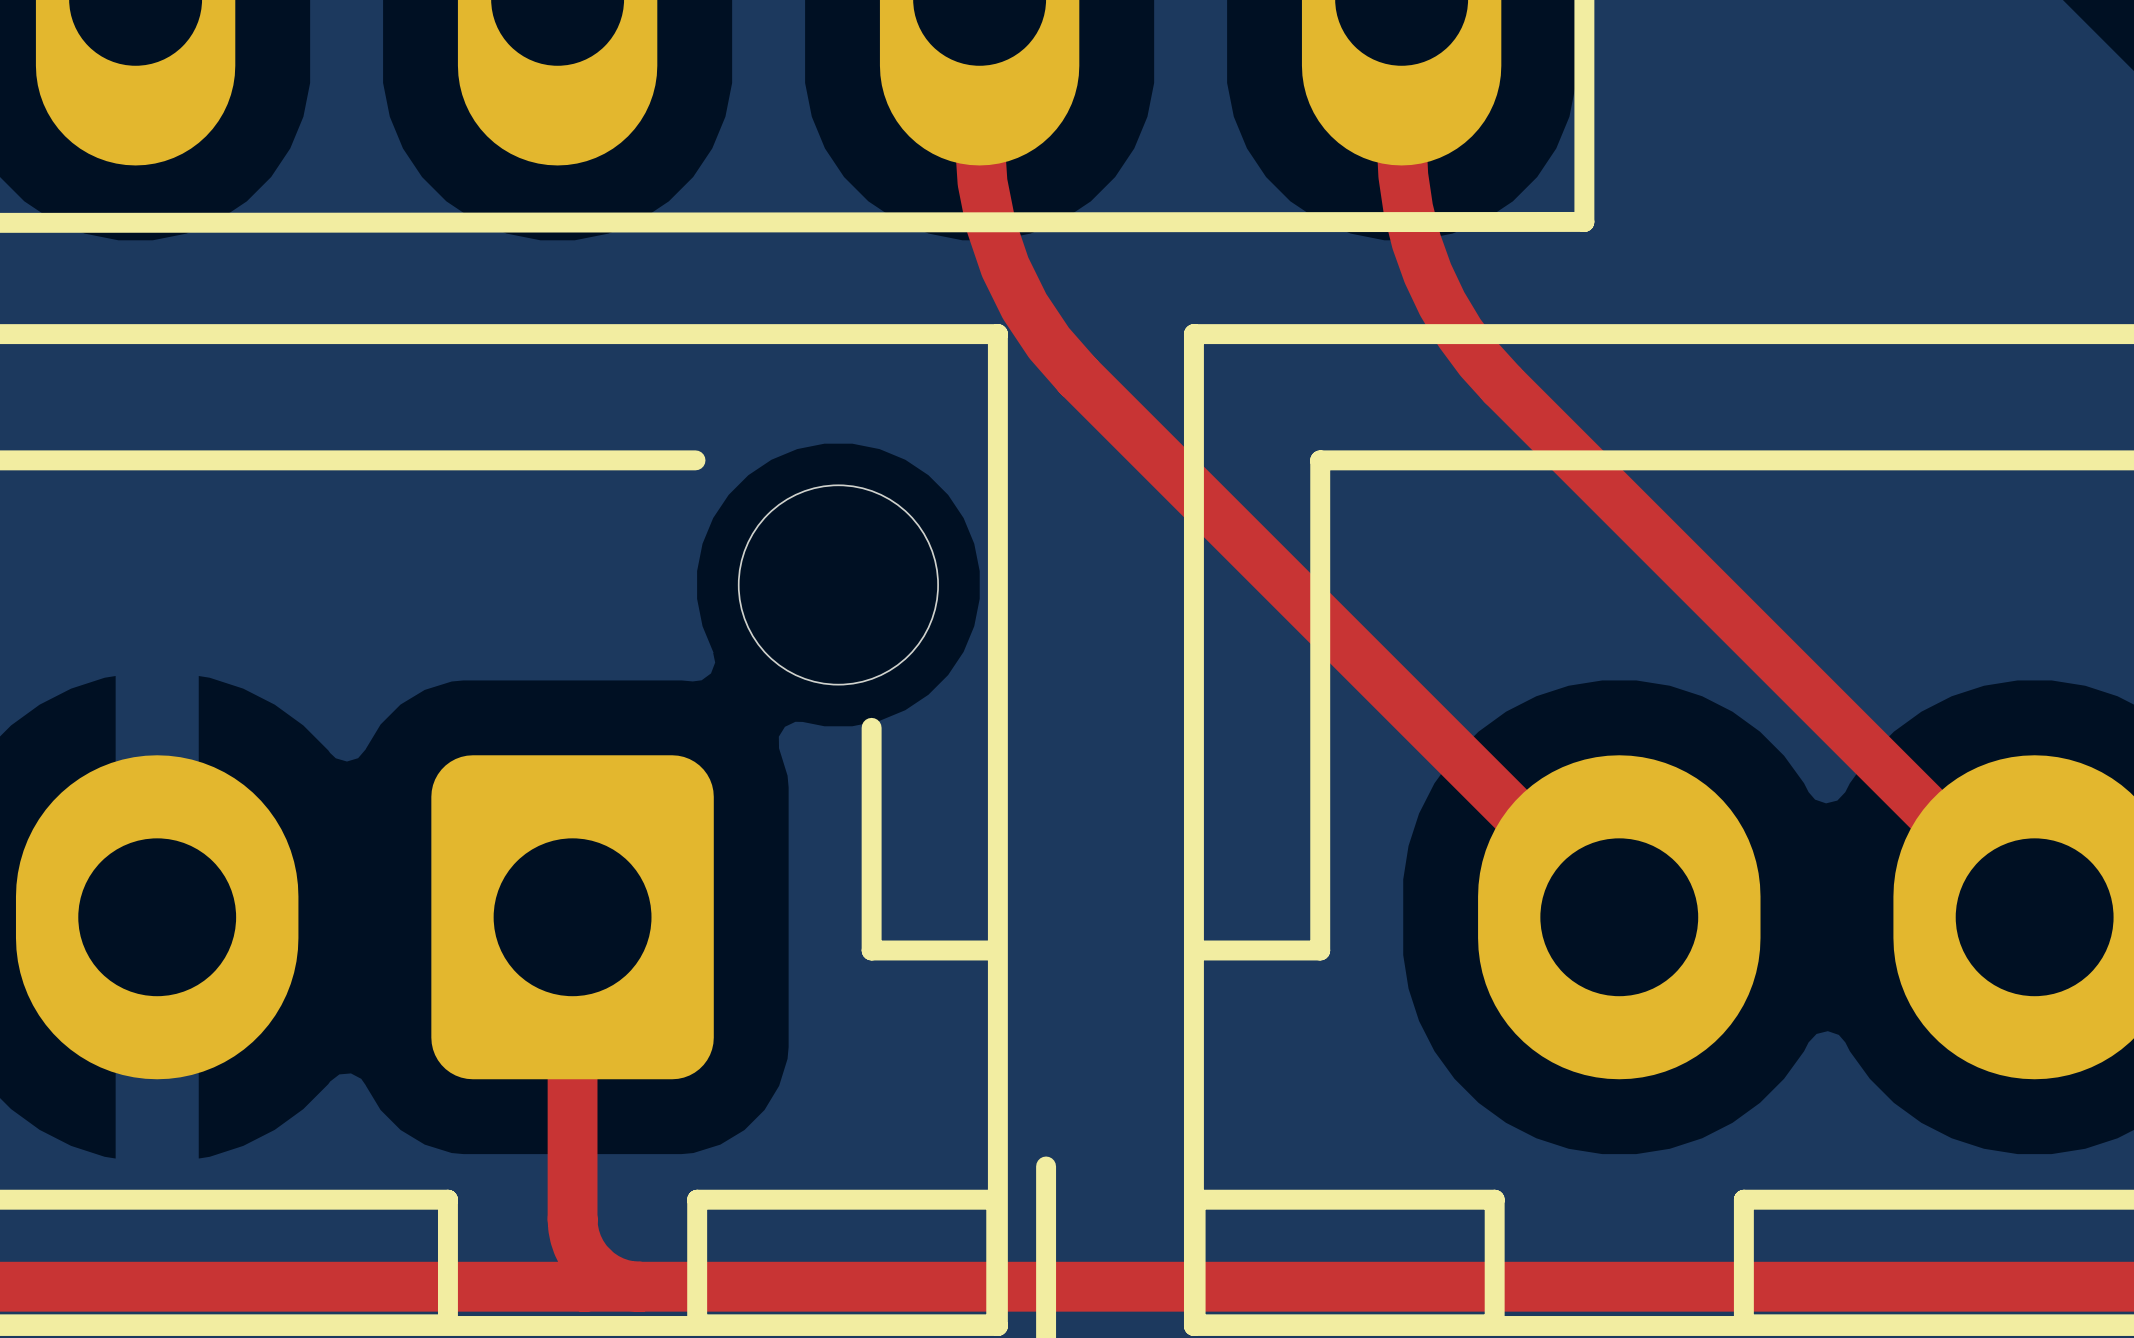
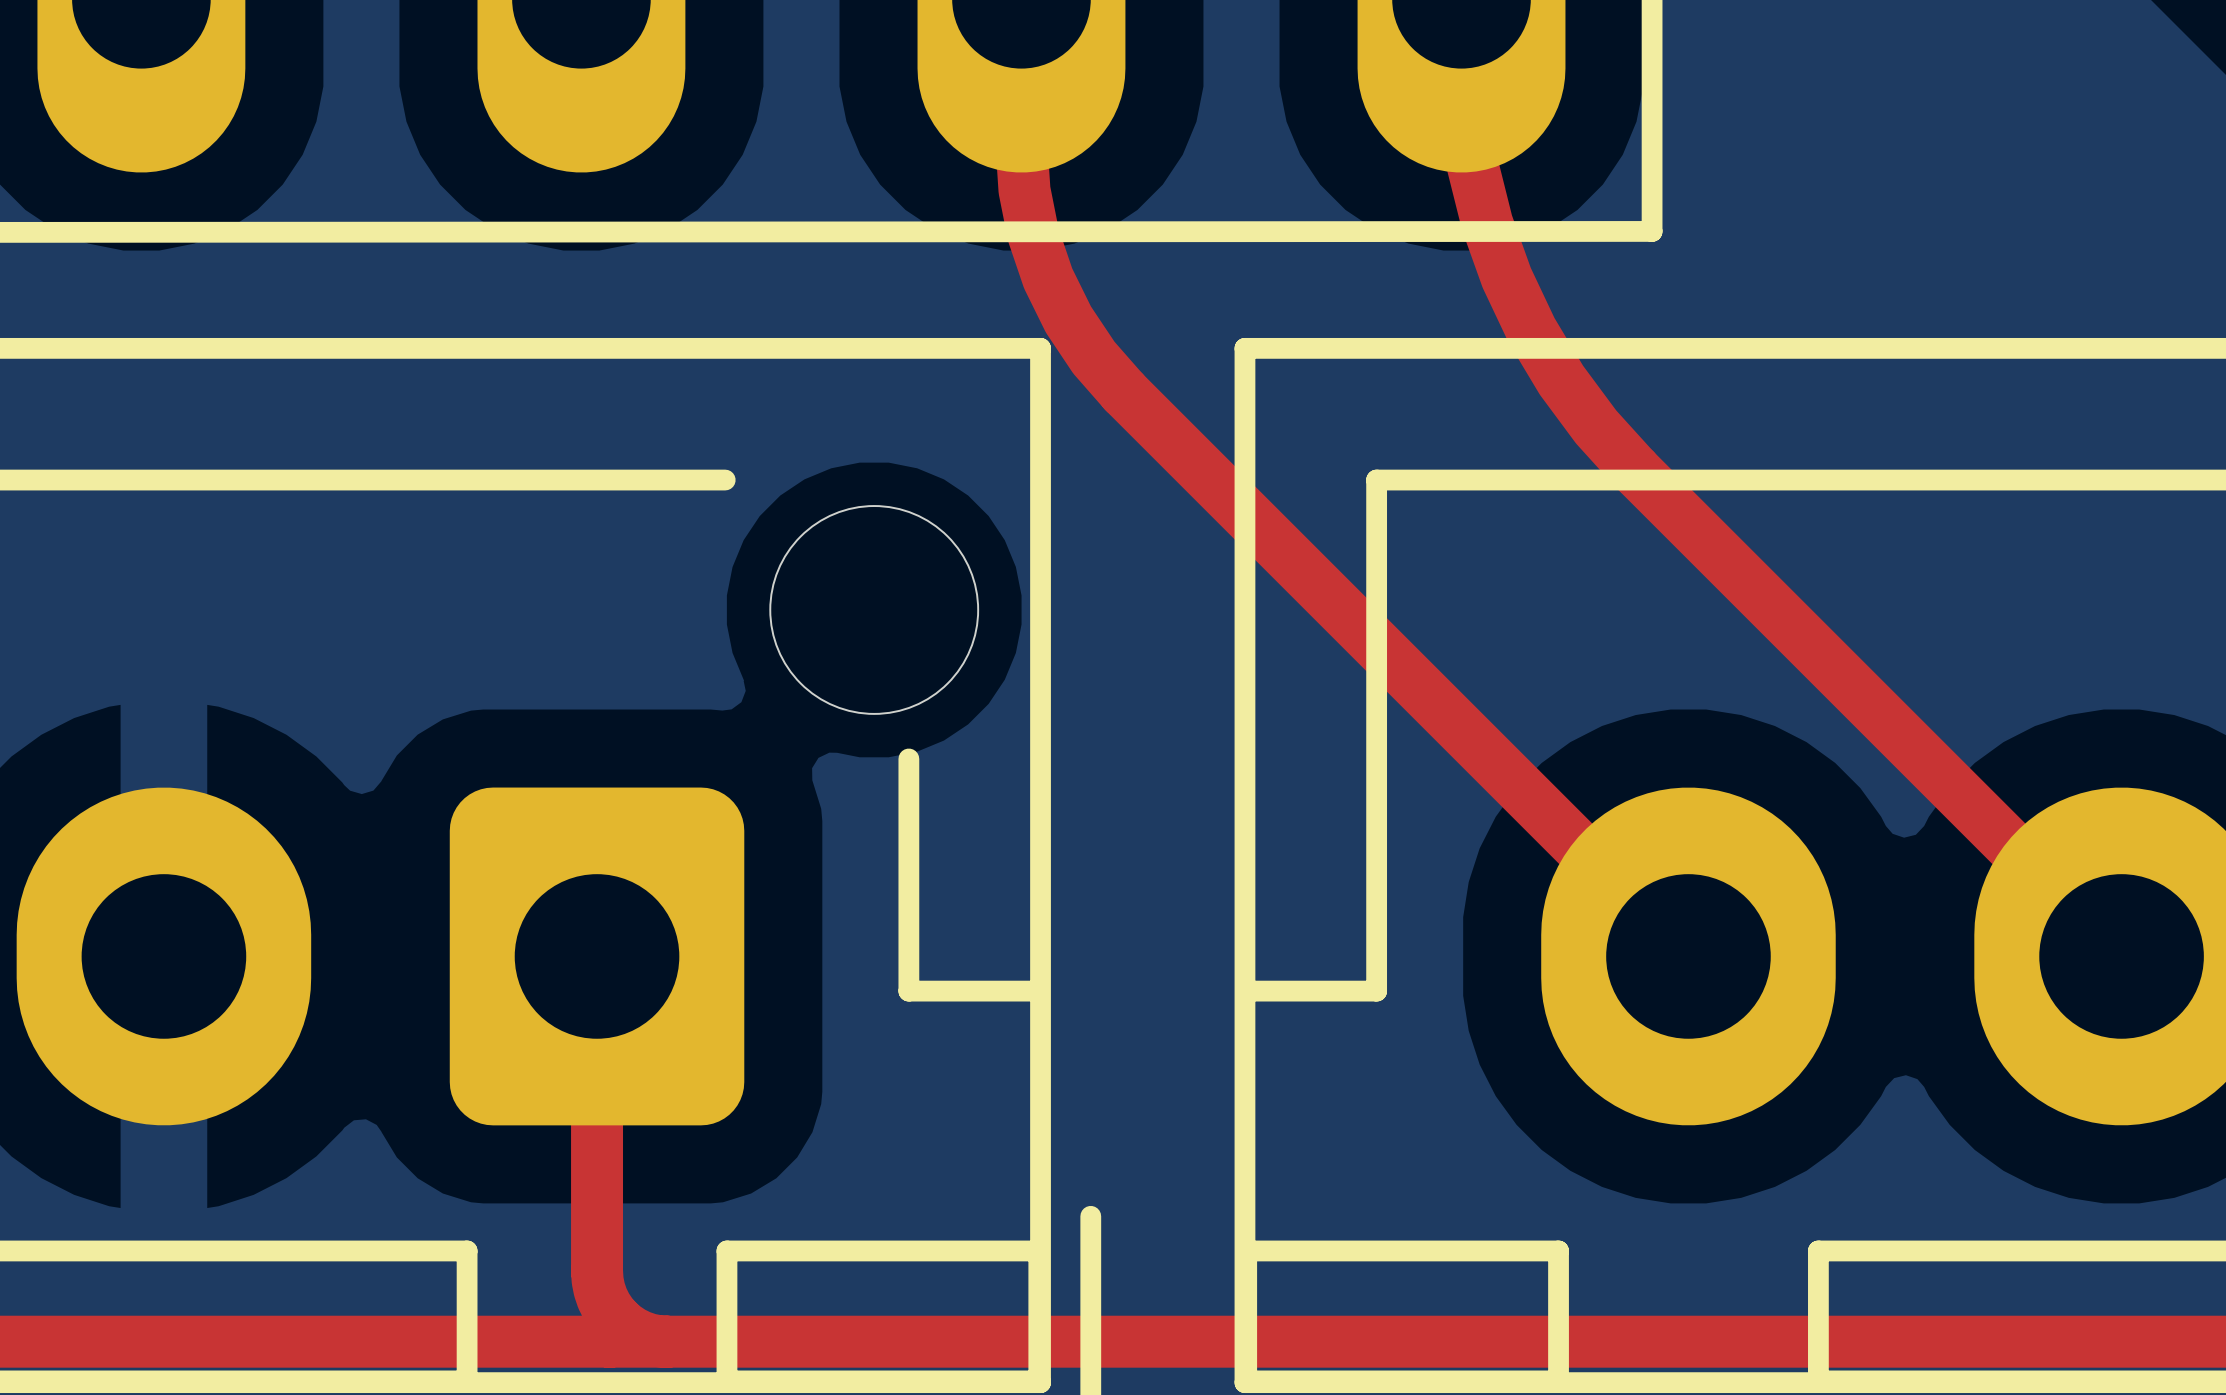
top track: (1401, 48) (1403, 175) (1408, 208) (1416, 241) (1427, 273) (1442, 303) (1459, 332) (1479, 359) (1568, 450) -> (1461, 50) (1464, 108) (1472, 166) (1487, 222) (1506, 277) (1531, 330) (1561, 380) (1596, 426) (1635, 470)

